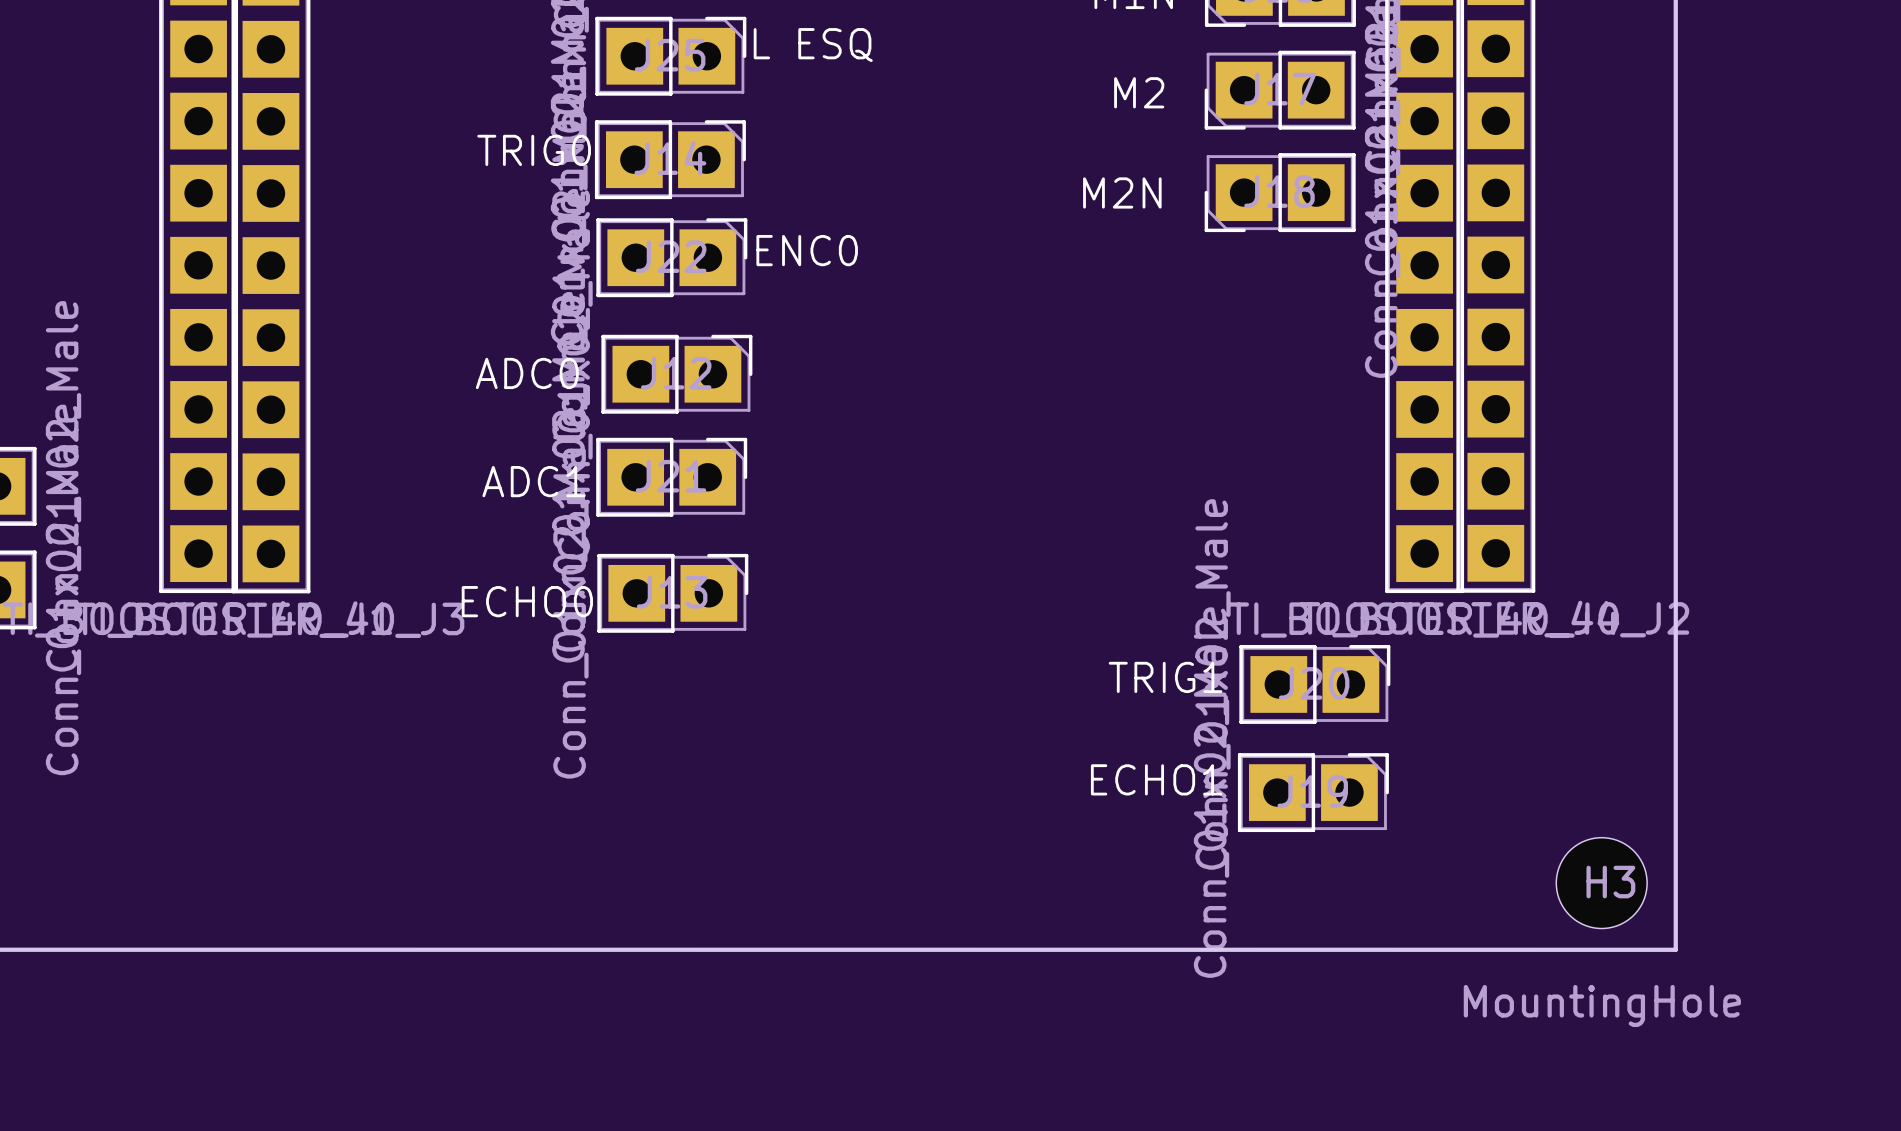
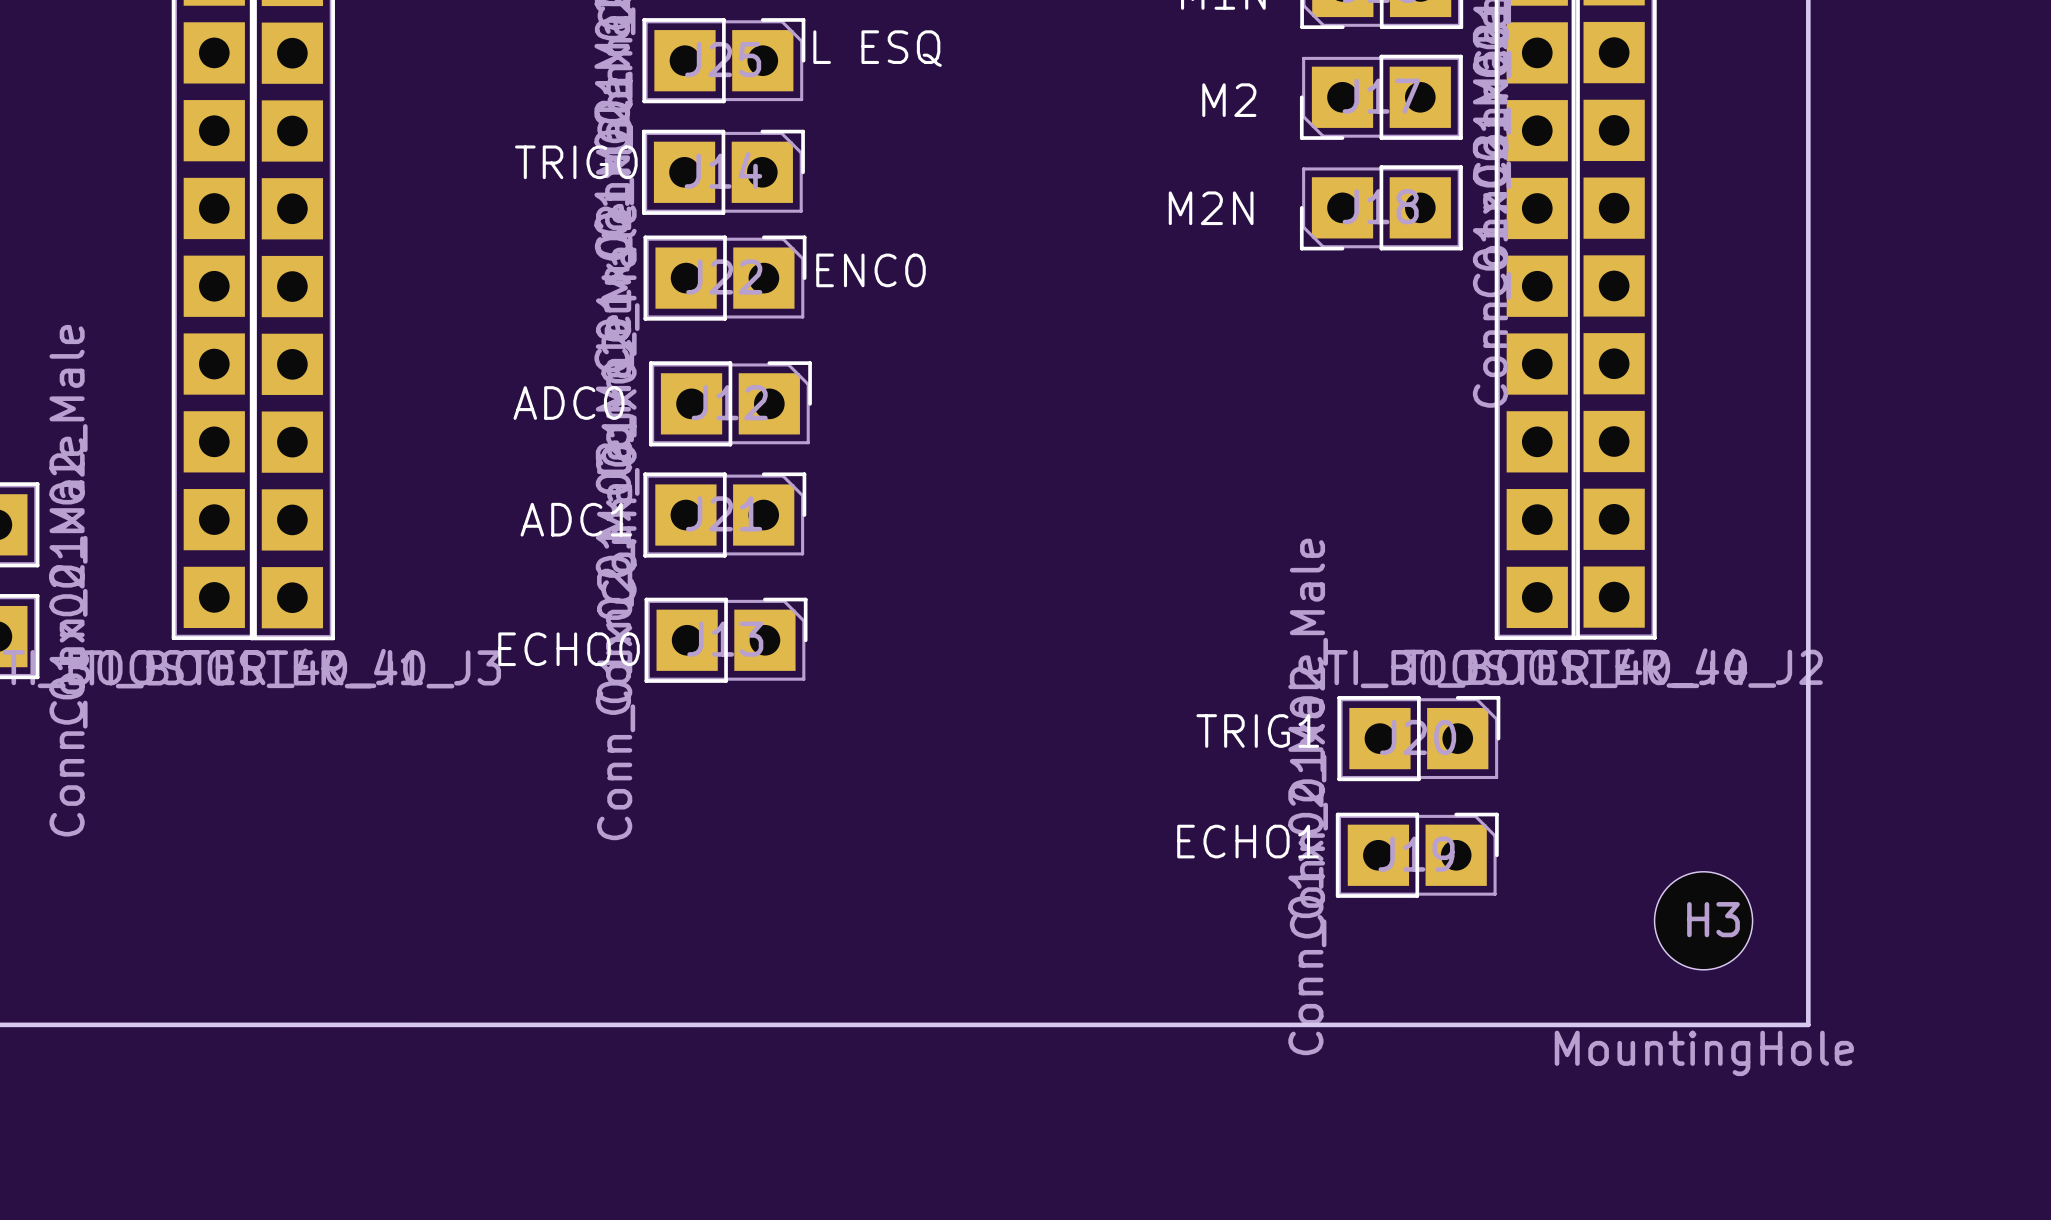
H3 position: (1601, 883) -> (1703, 920)

